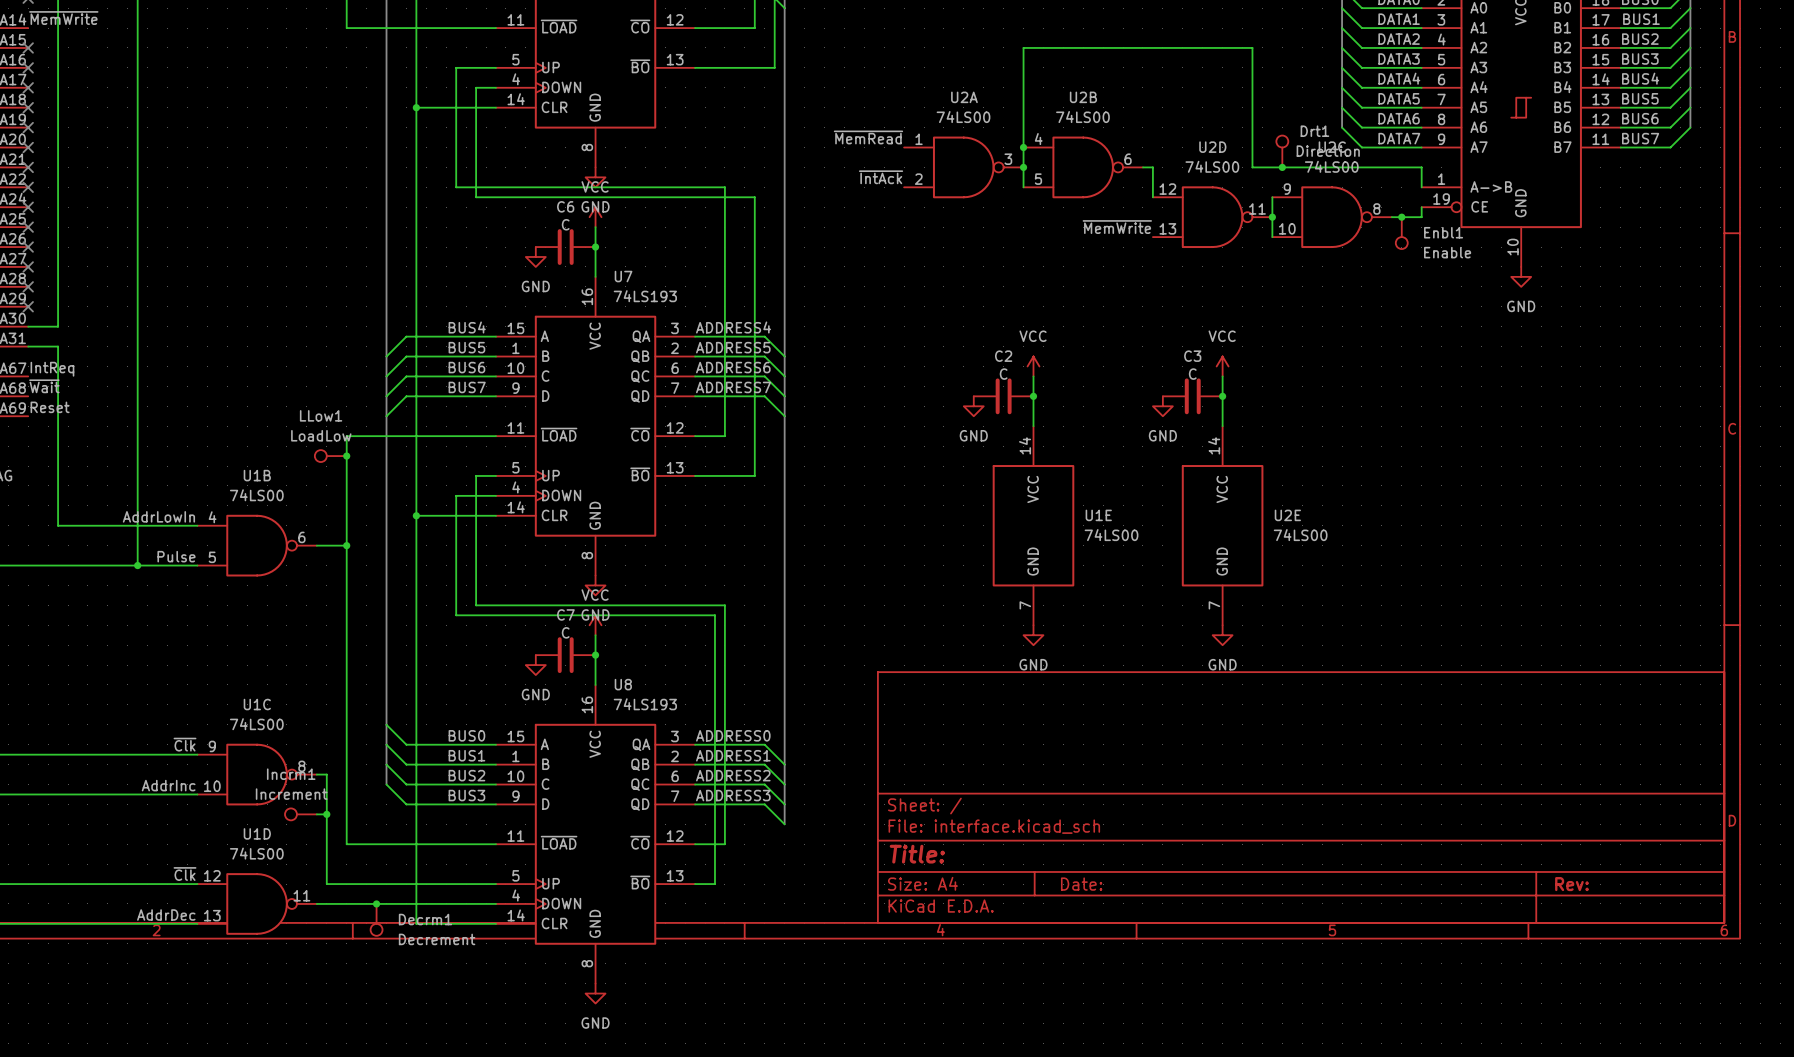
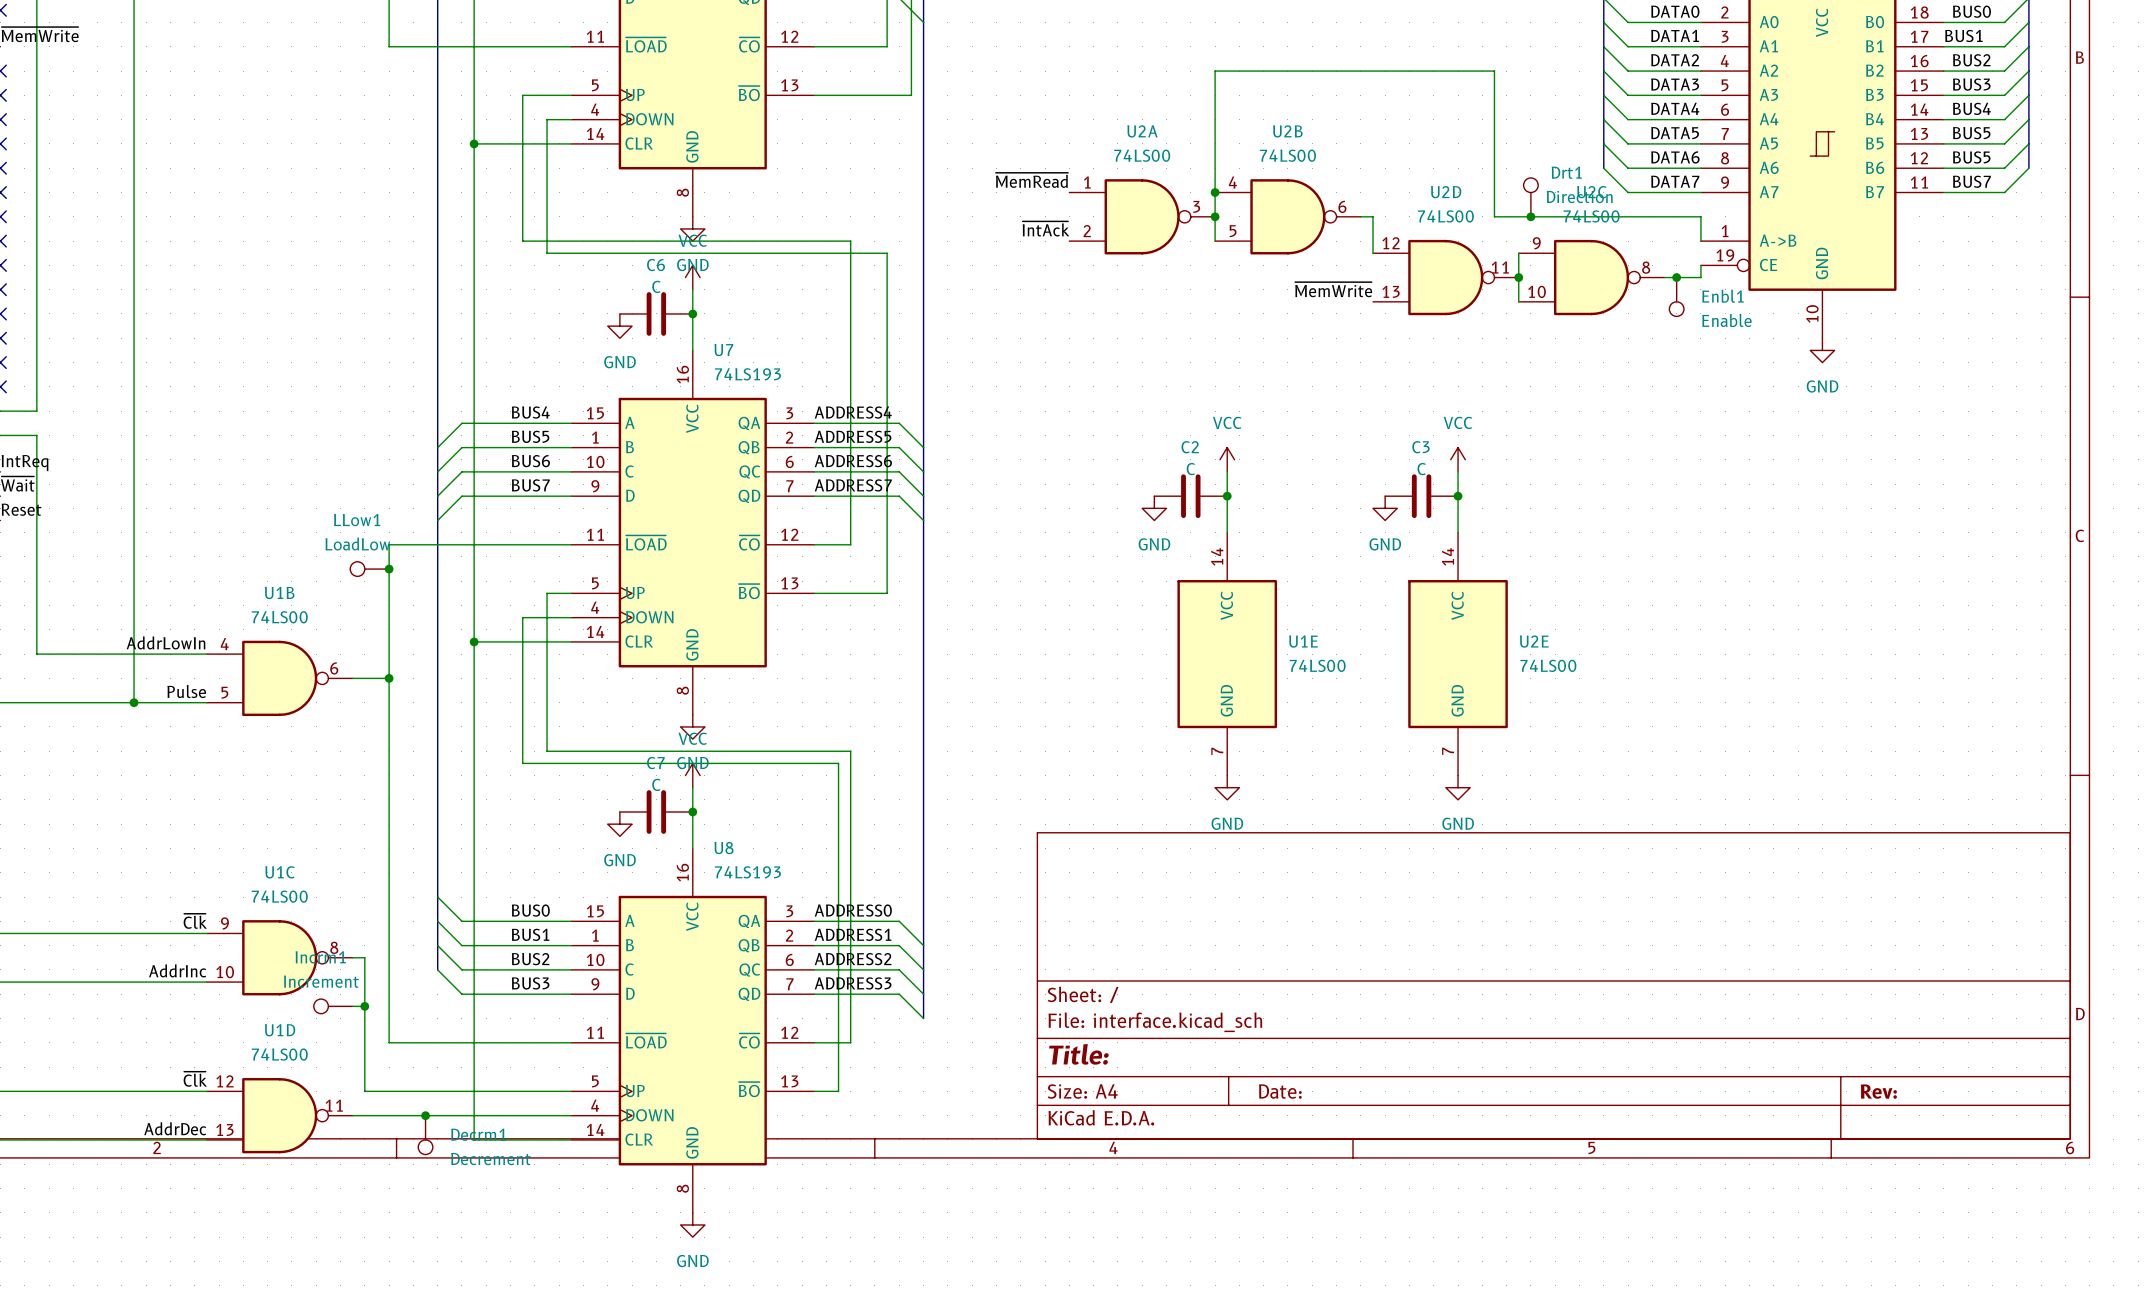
label: BUS6 (1640, 118) -> BUS5 (1971, 157)

